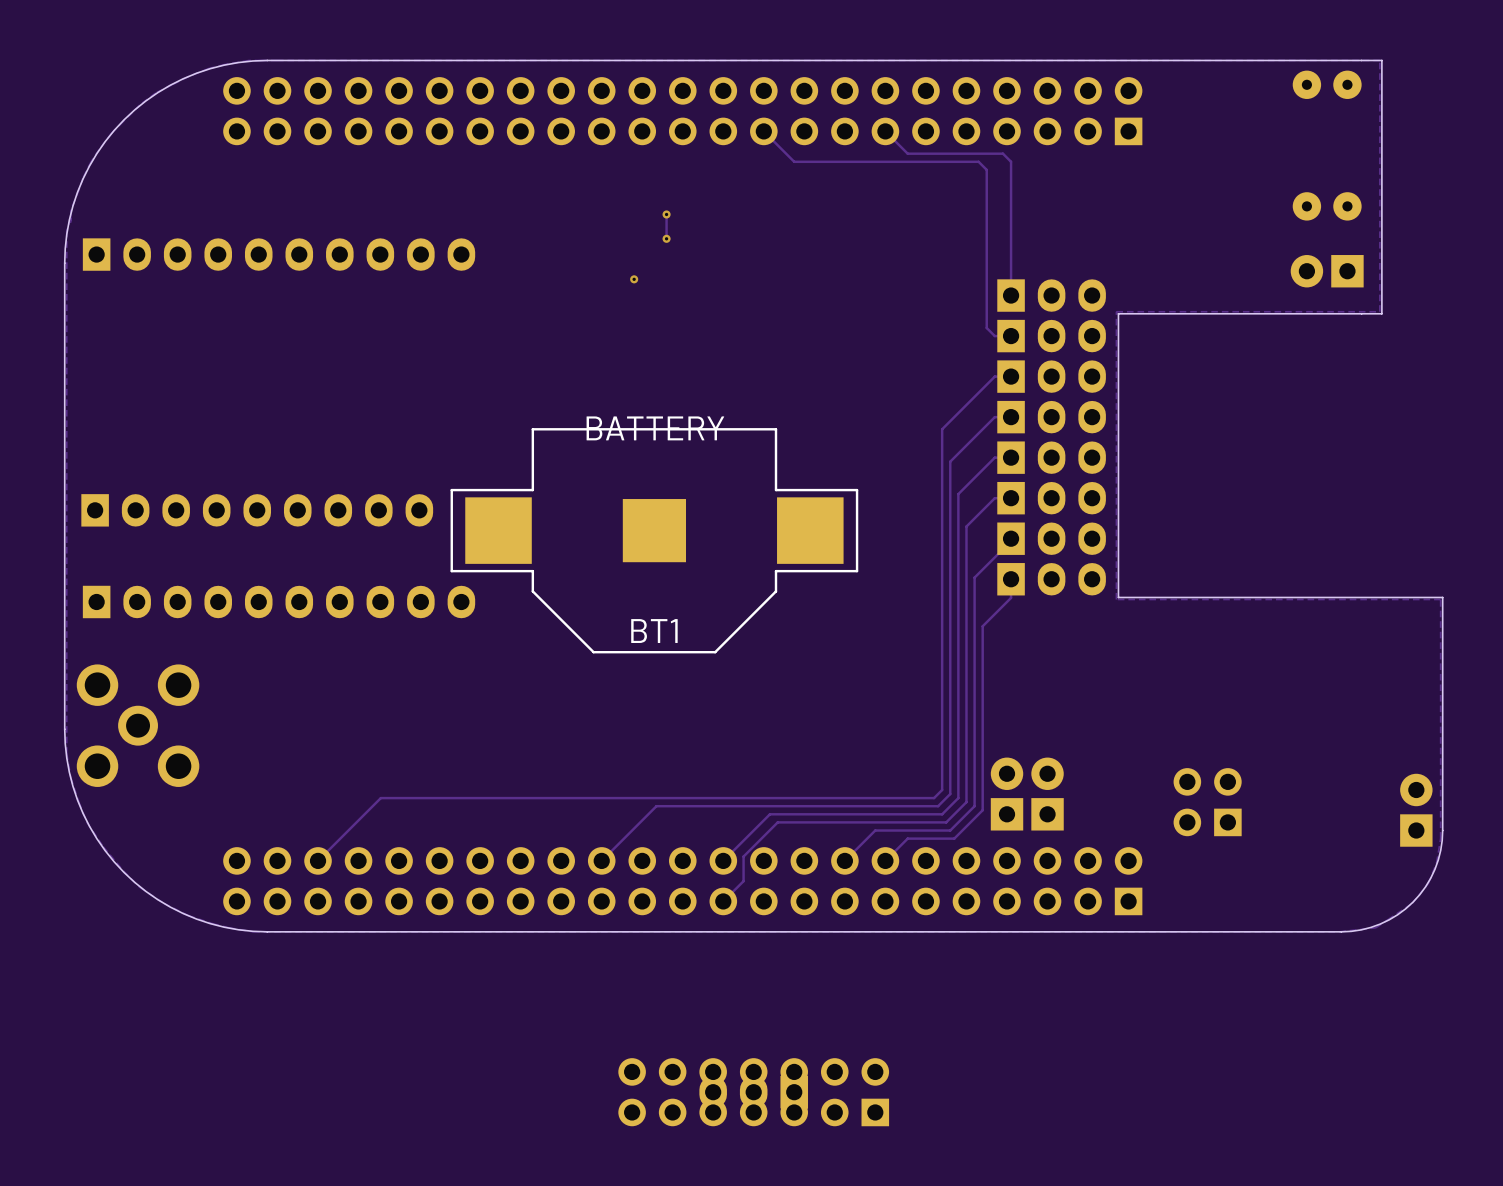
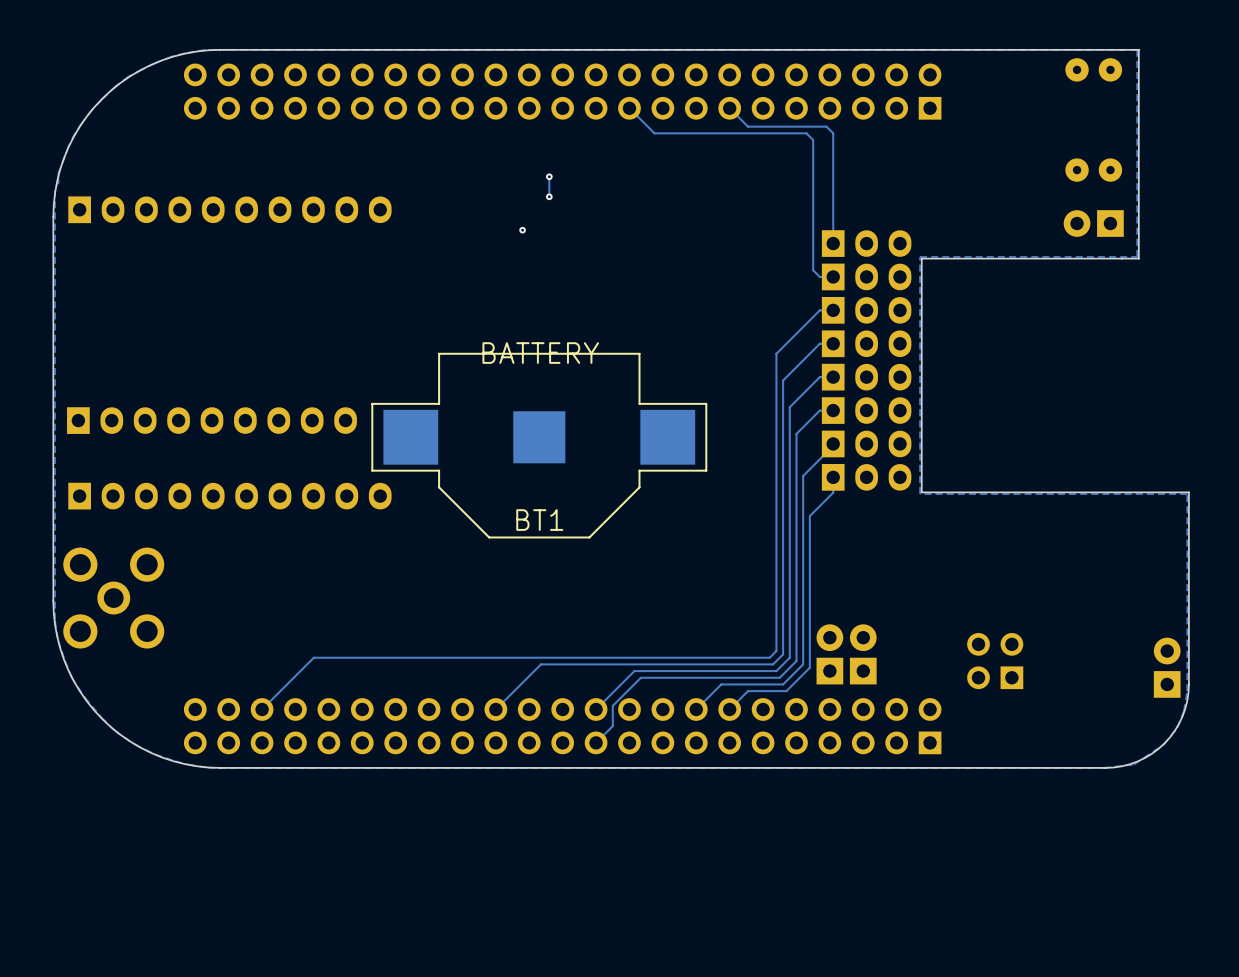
part: (753, 1092) -> none
part: (753, 1092) -> none

